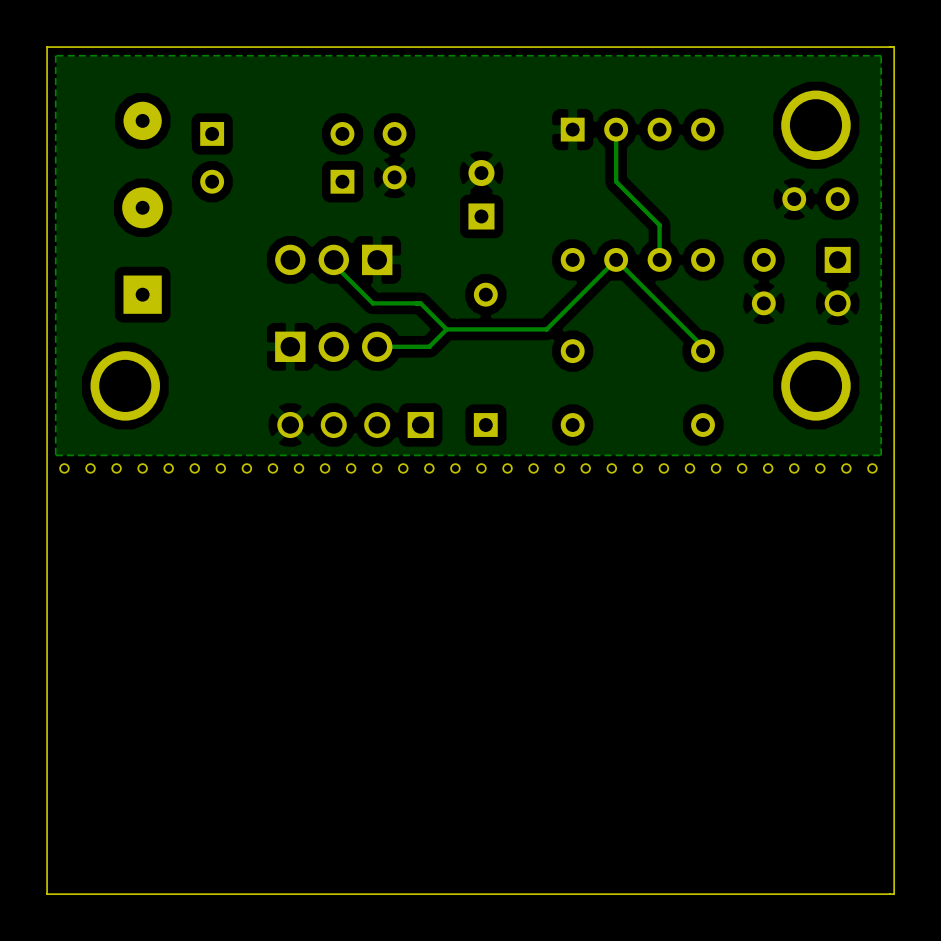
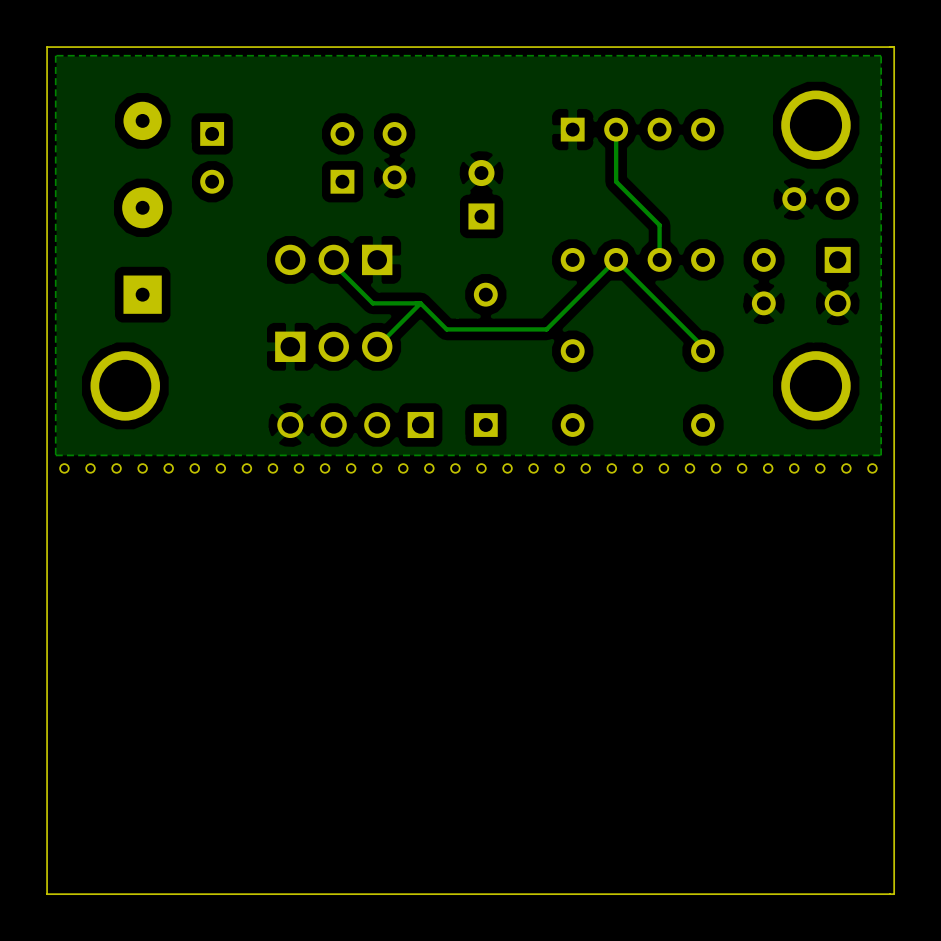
track: (446, 329) (429, 346) (377, 346) -> (420, 303) (377, 346)

